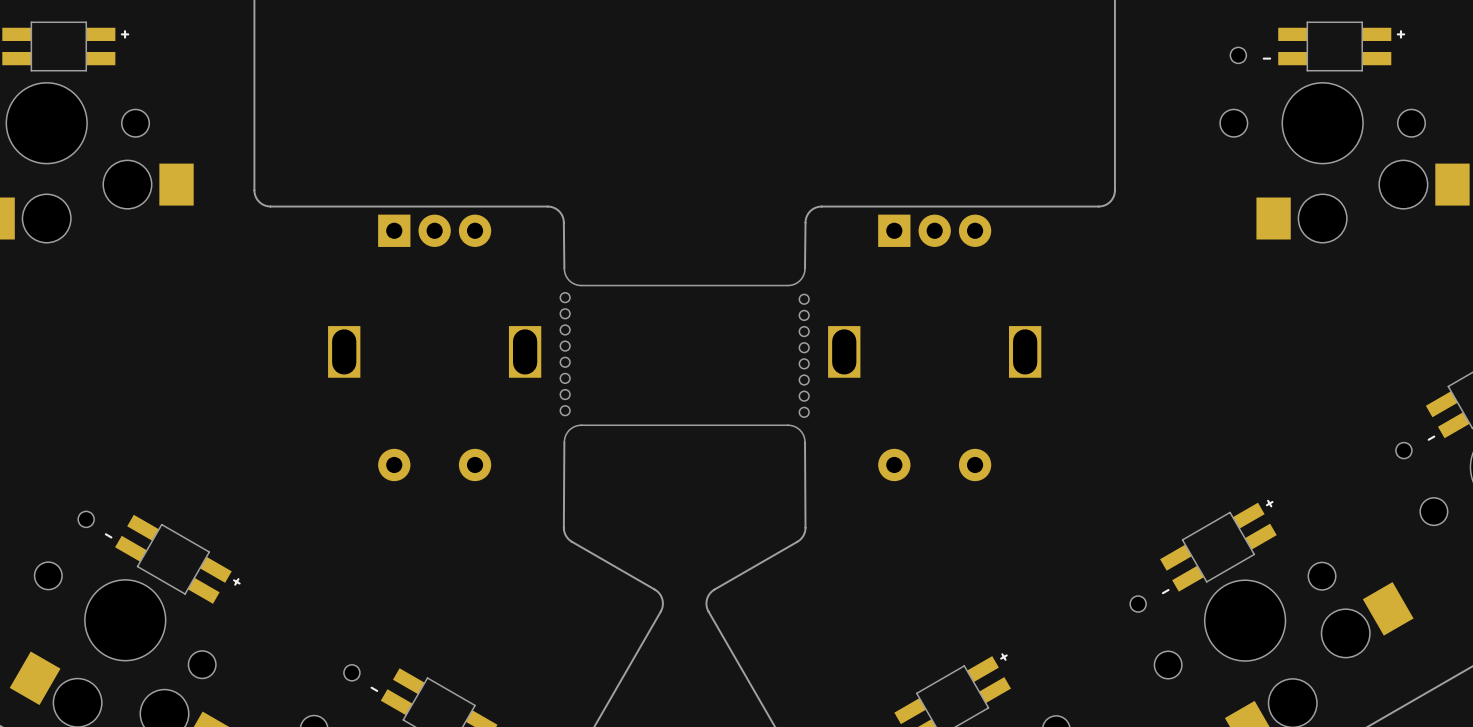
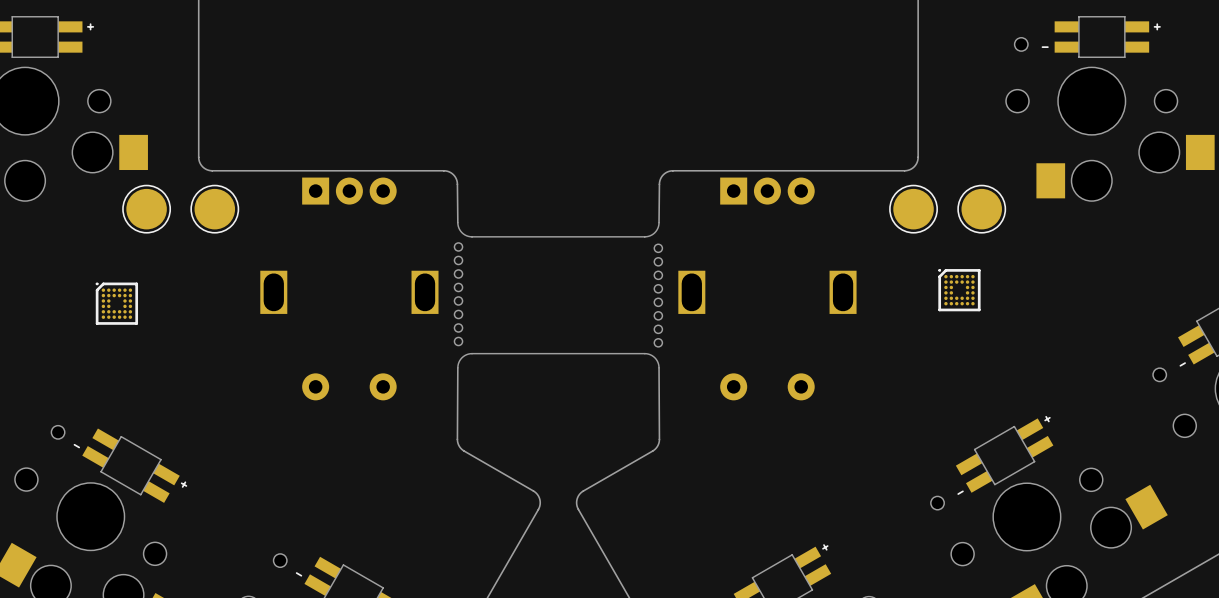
part: none -> (146, 209)
part: none -> (214, 209)
part: none -> (913, 209)
part: none -> (981, 209)
part: none -> (959, 290)
part: none -> (116, 303)

